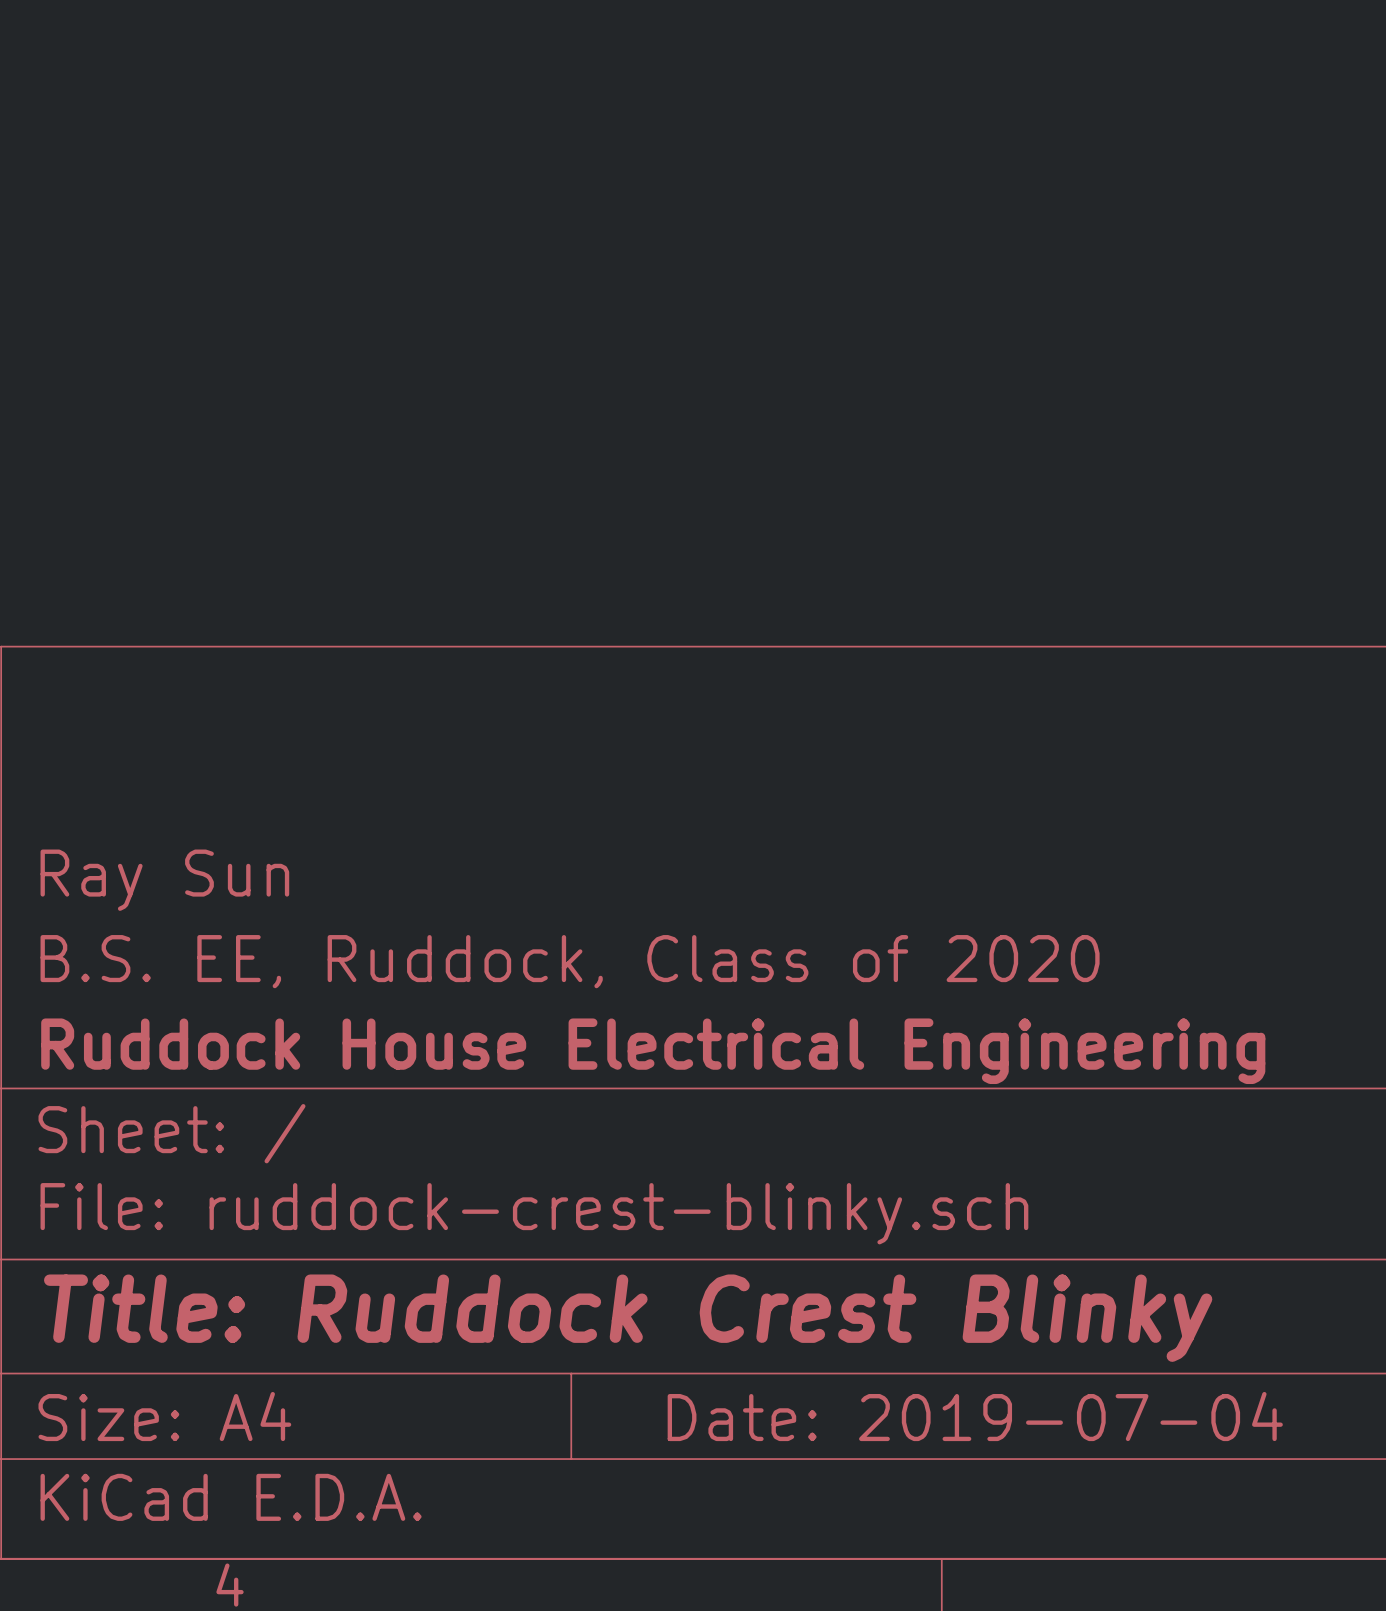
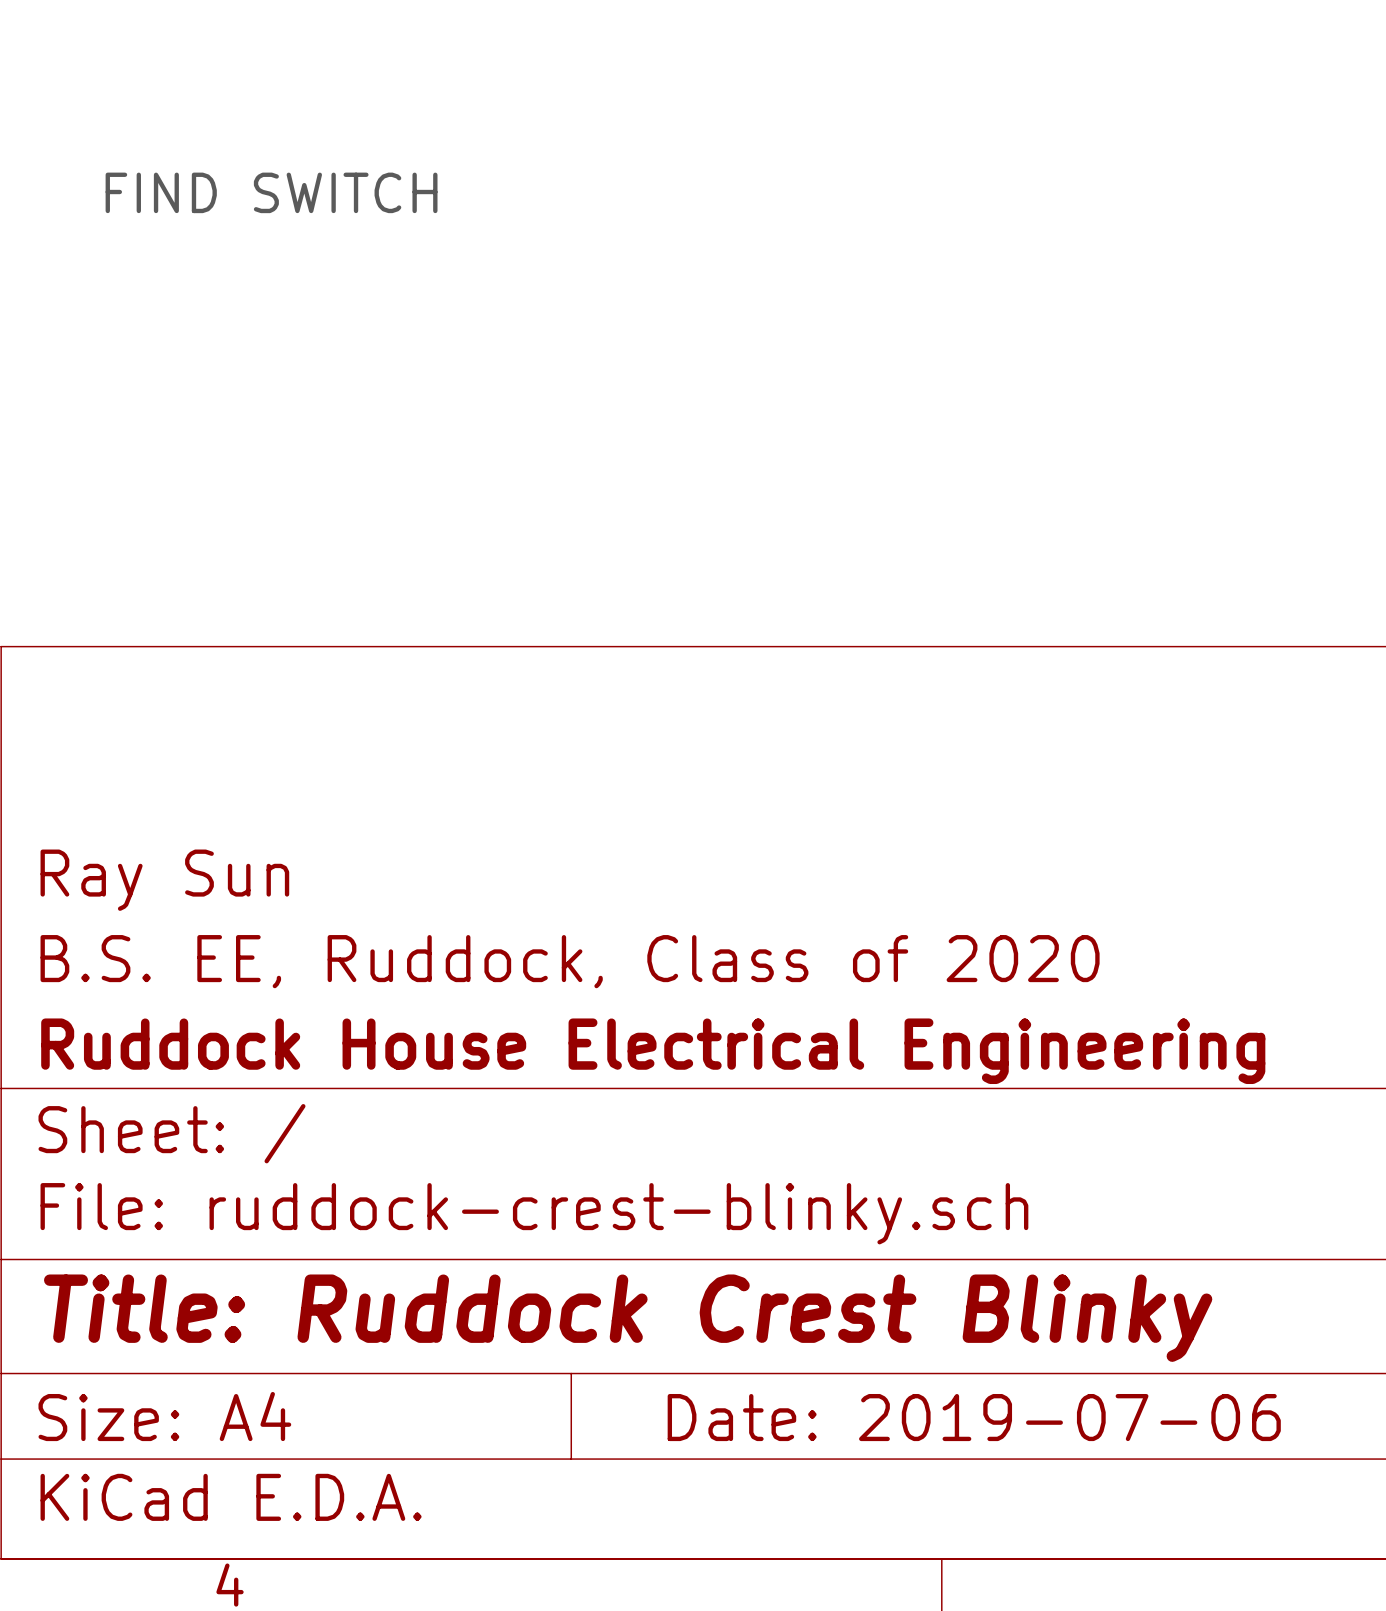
text: none -> FIND SWITCH (271, 192)
title block: Date: 2019-07-04 (975, 1416) -> Date: 2019-07-06 (974, 1417)

